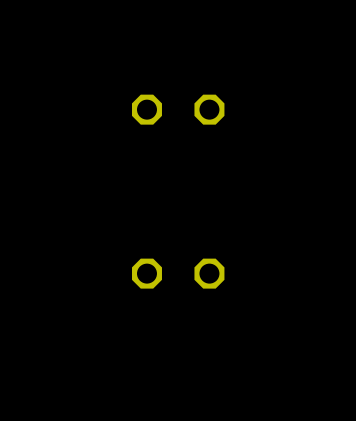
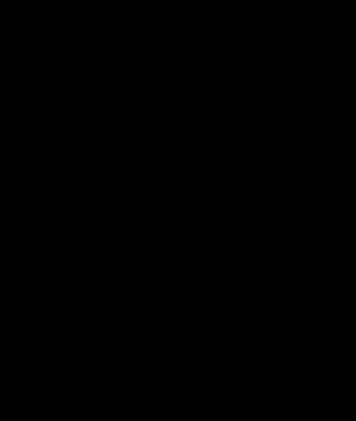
part: (178, 109) -> none
part: (178, 273) -> none

